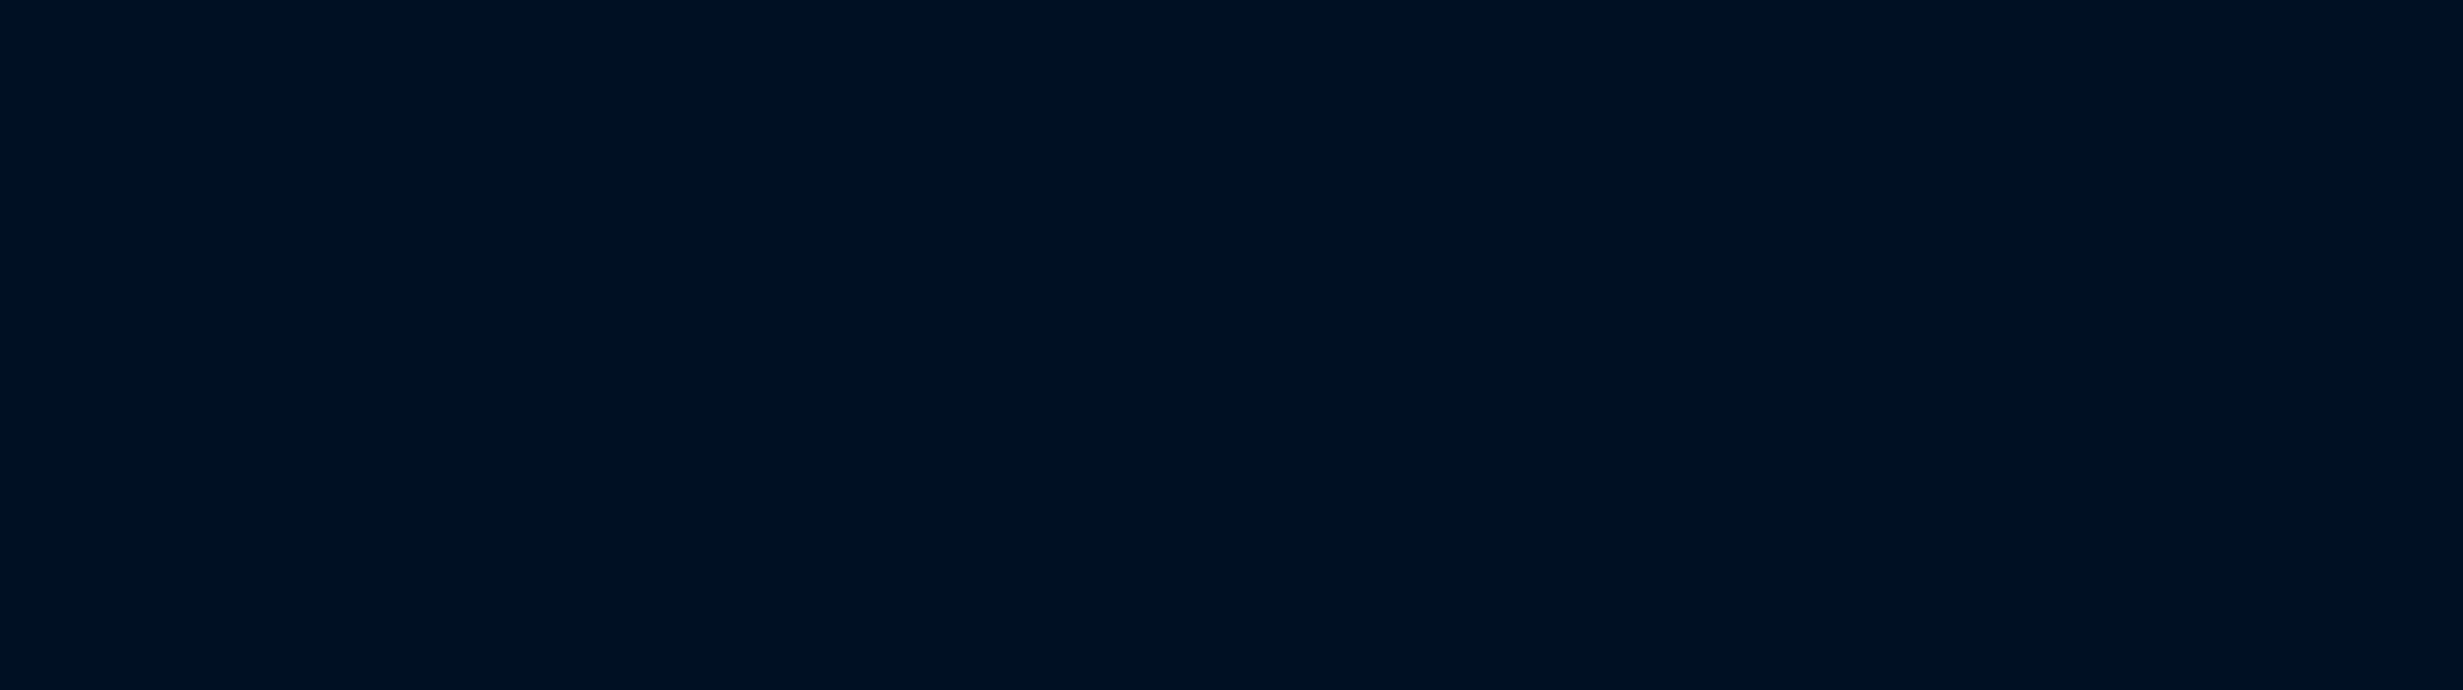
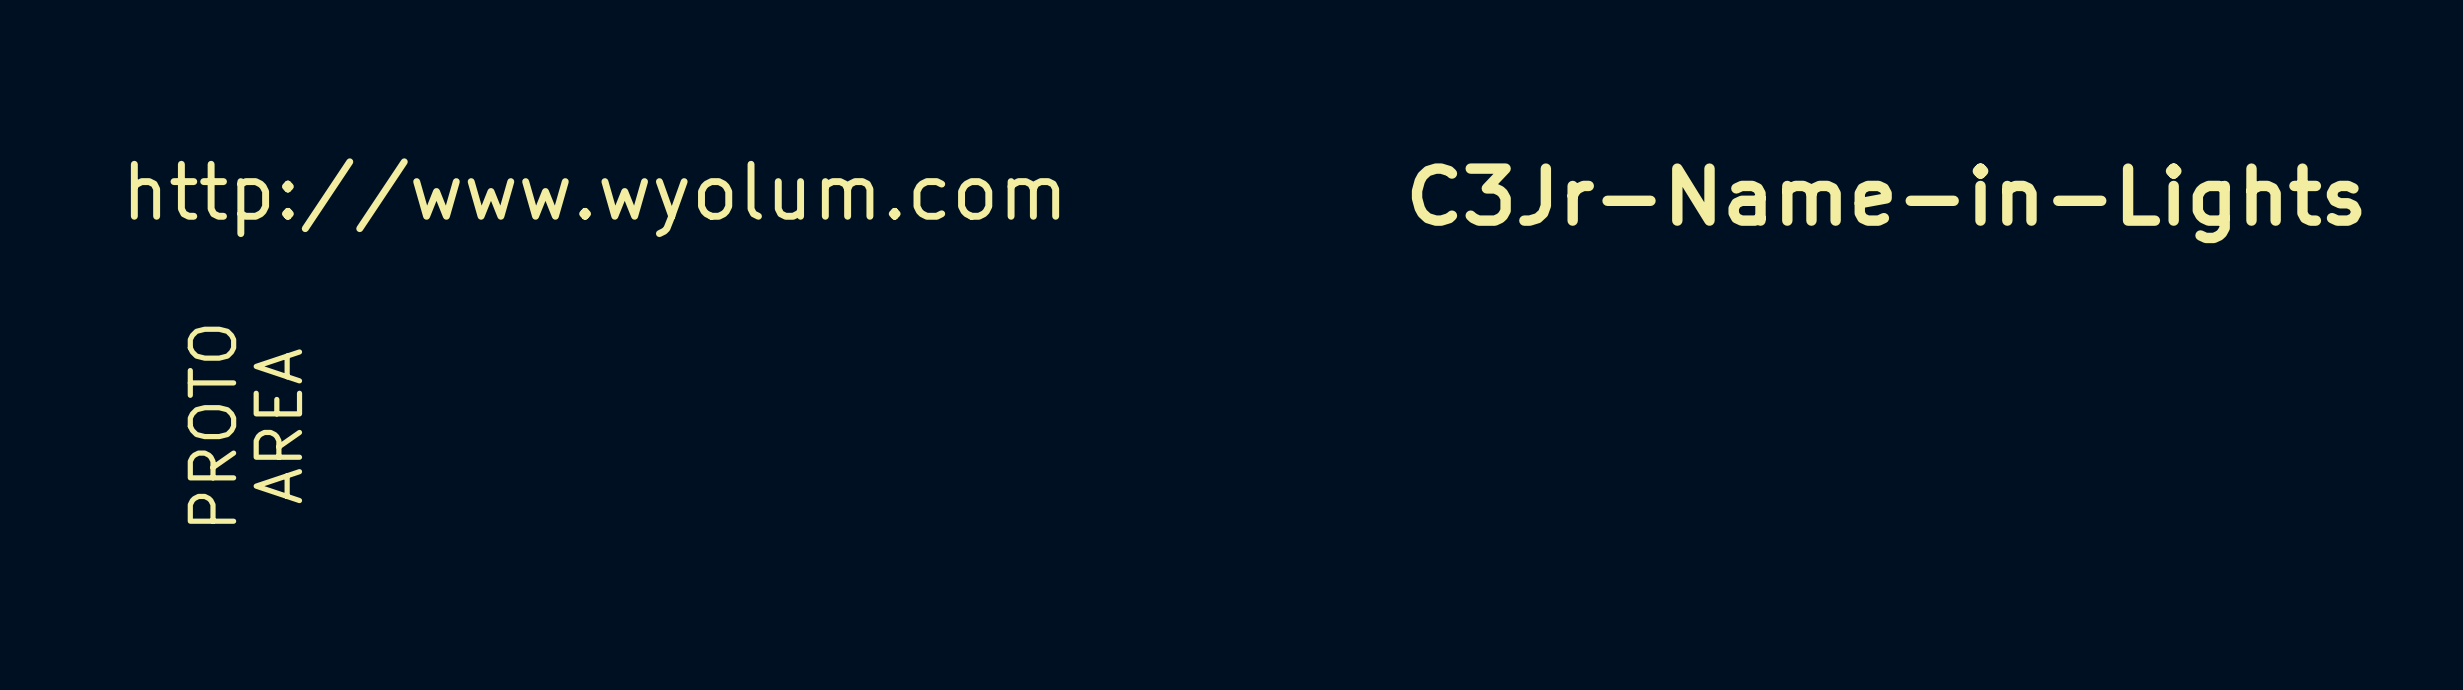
text: none -> http://www.wyolum.com (595, 197)
text: none -> C3Jr-Name-in-Lights (1886, 203)
text: none -> PROTO (211, 425)
text: none -> AREA (277, 426)

